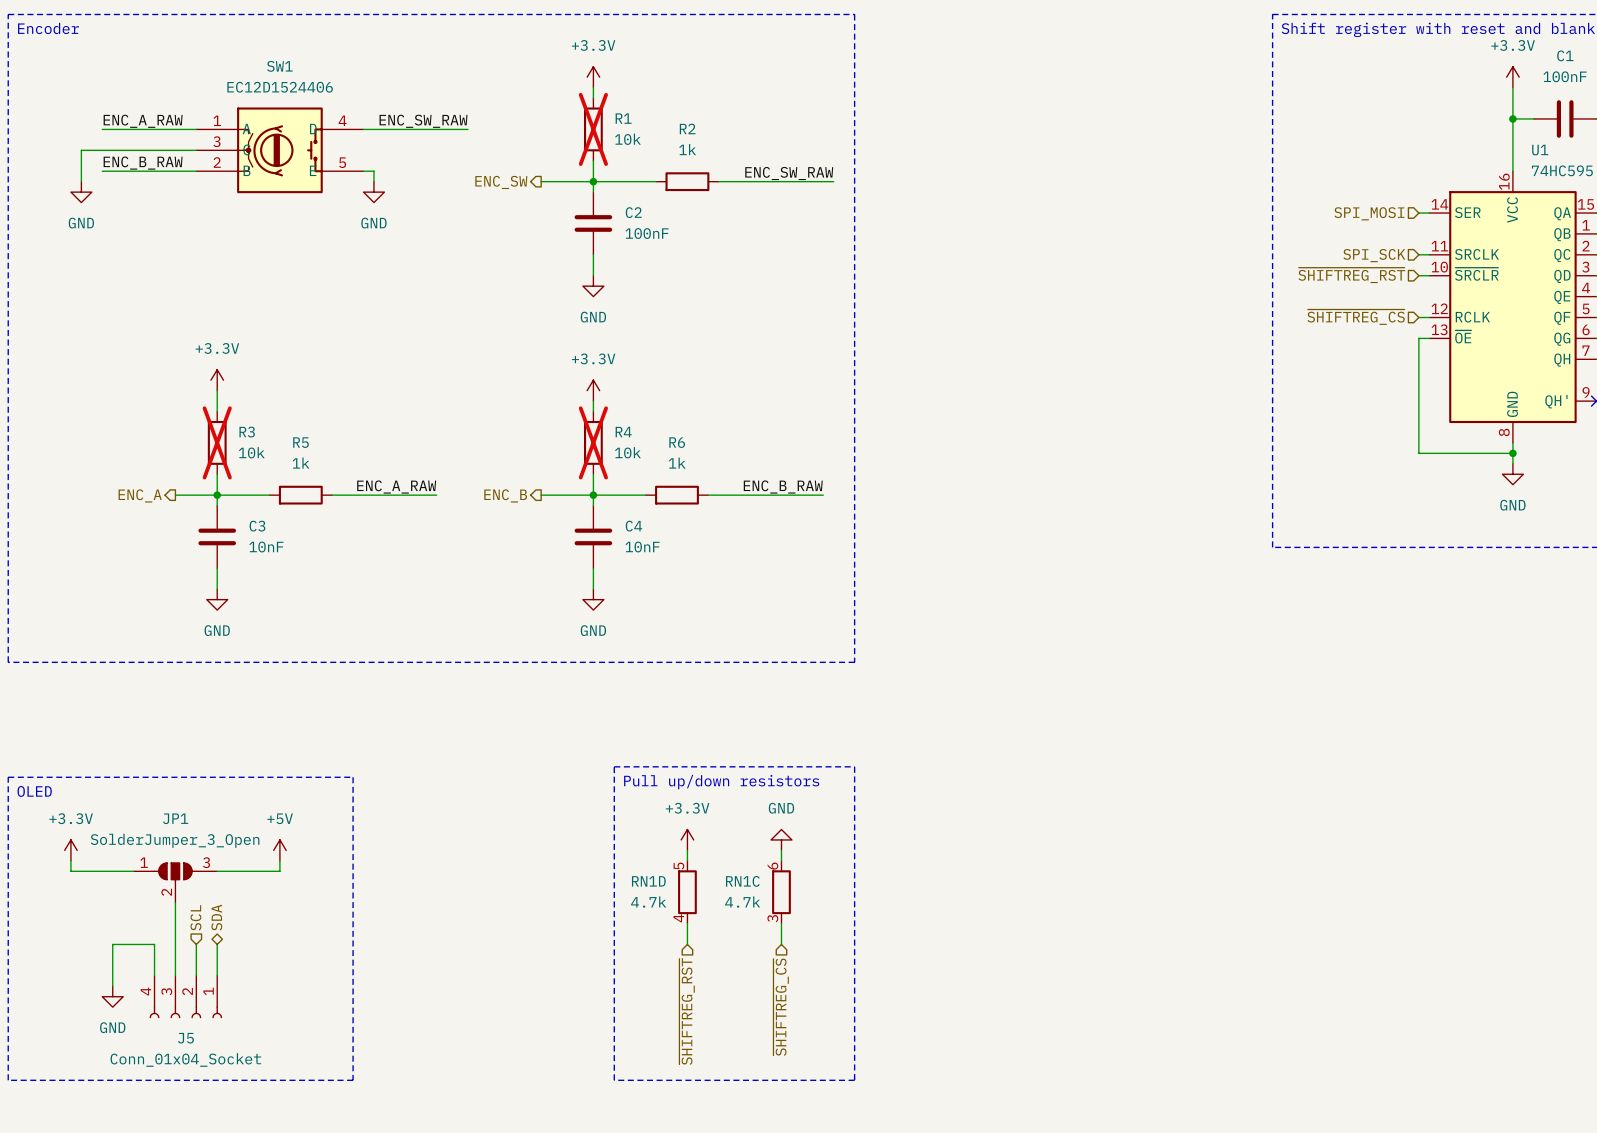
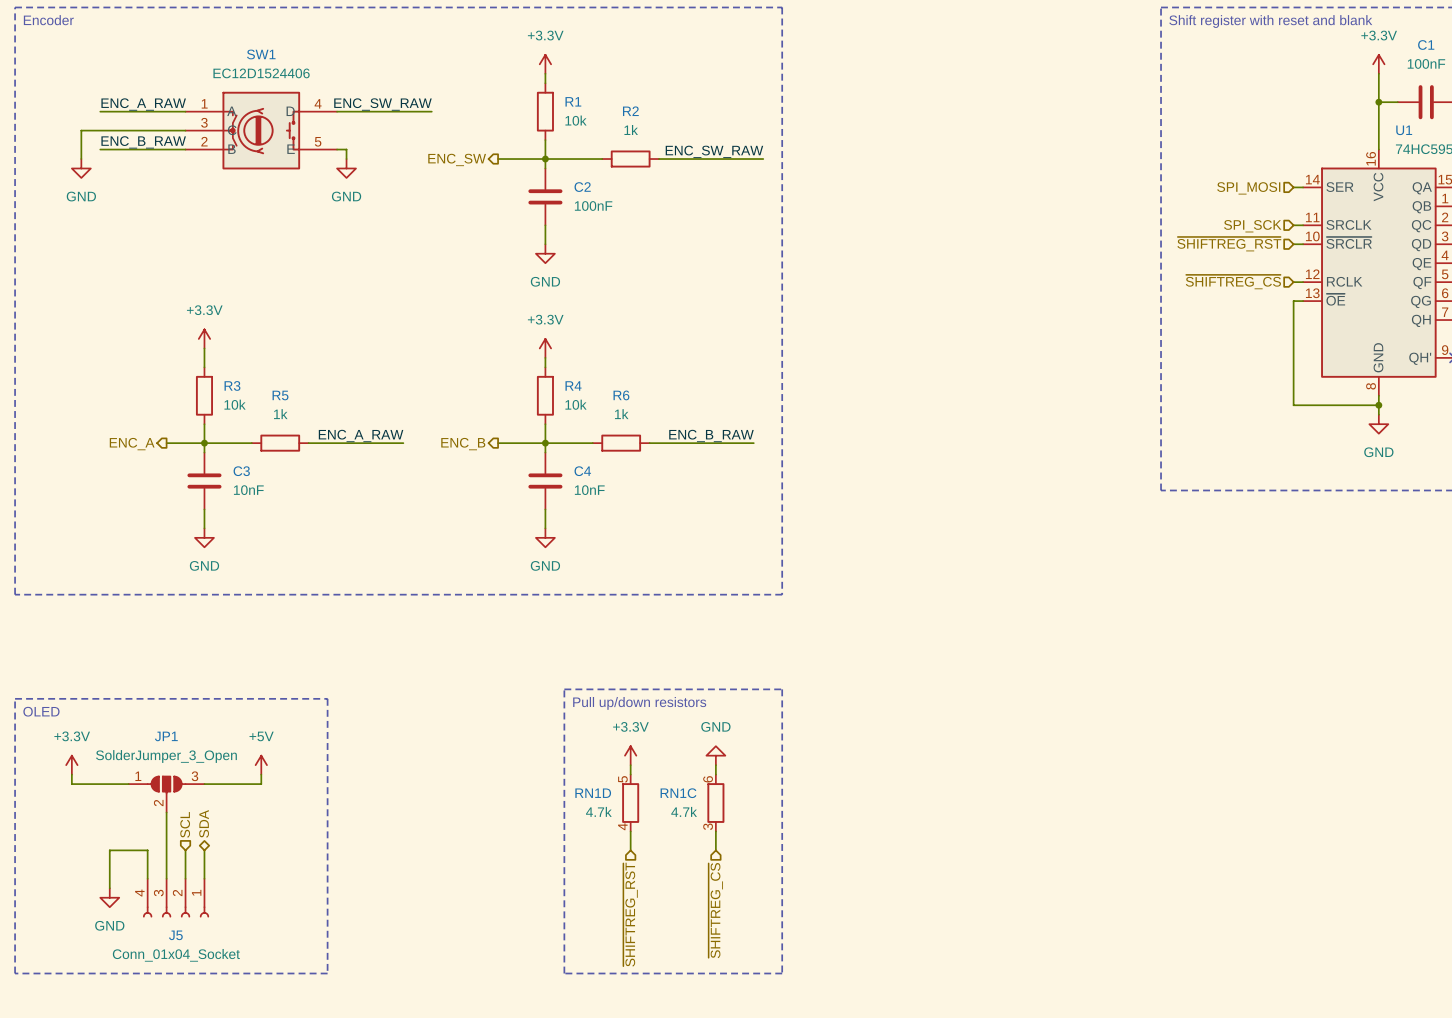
R1 do-not-place cross: (593, 129) -> none
R3 do-not-place cross: (217, 442) -> none
R4 do-not-place cross: (593, 442) -> none

